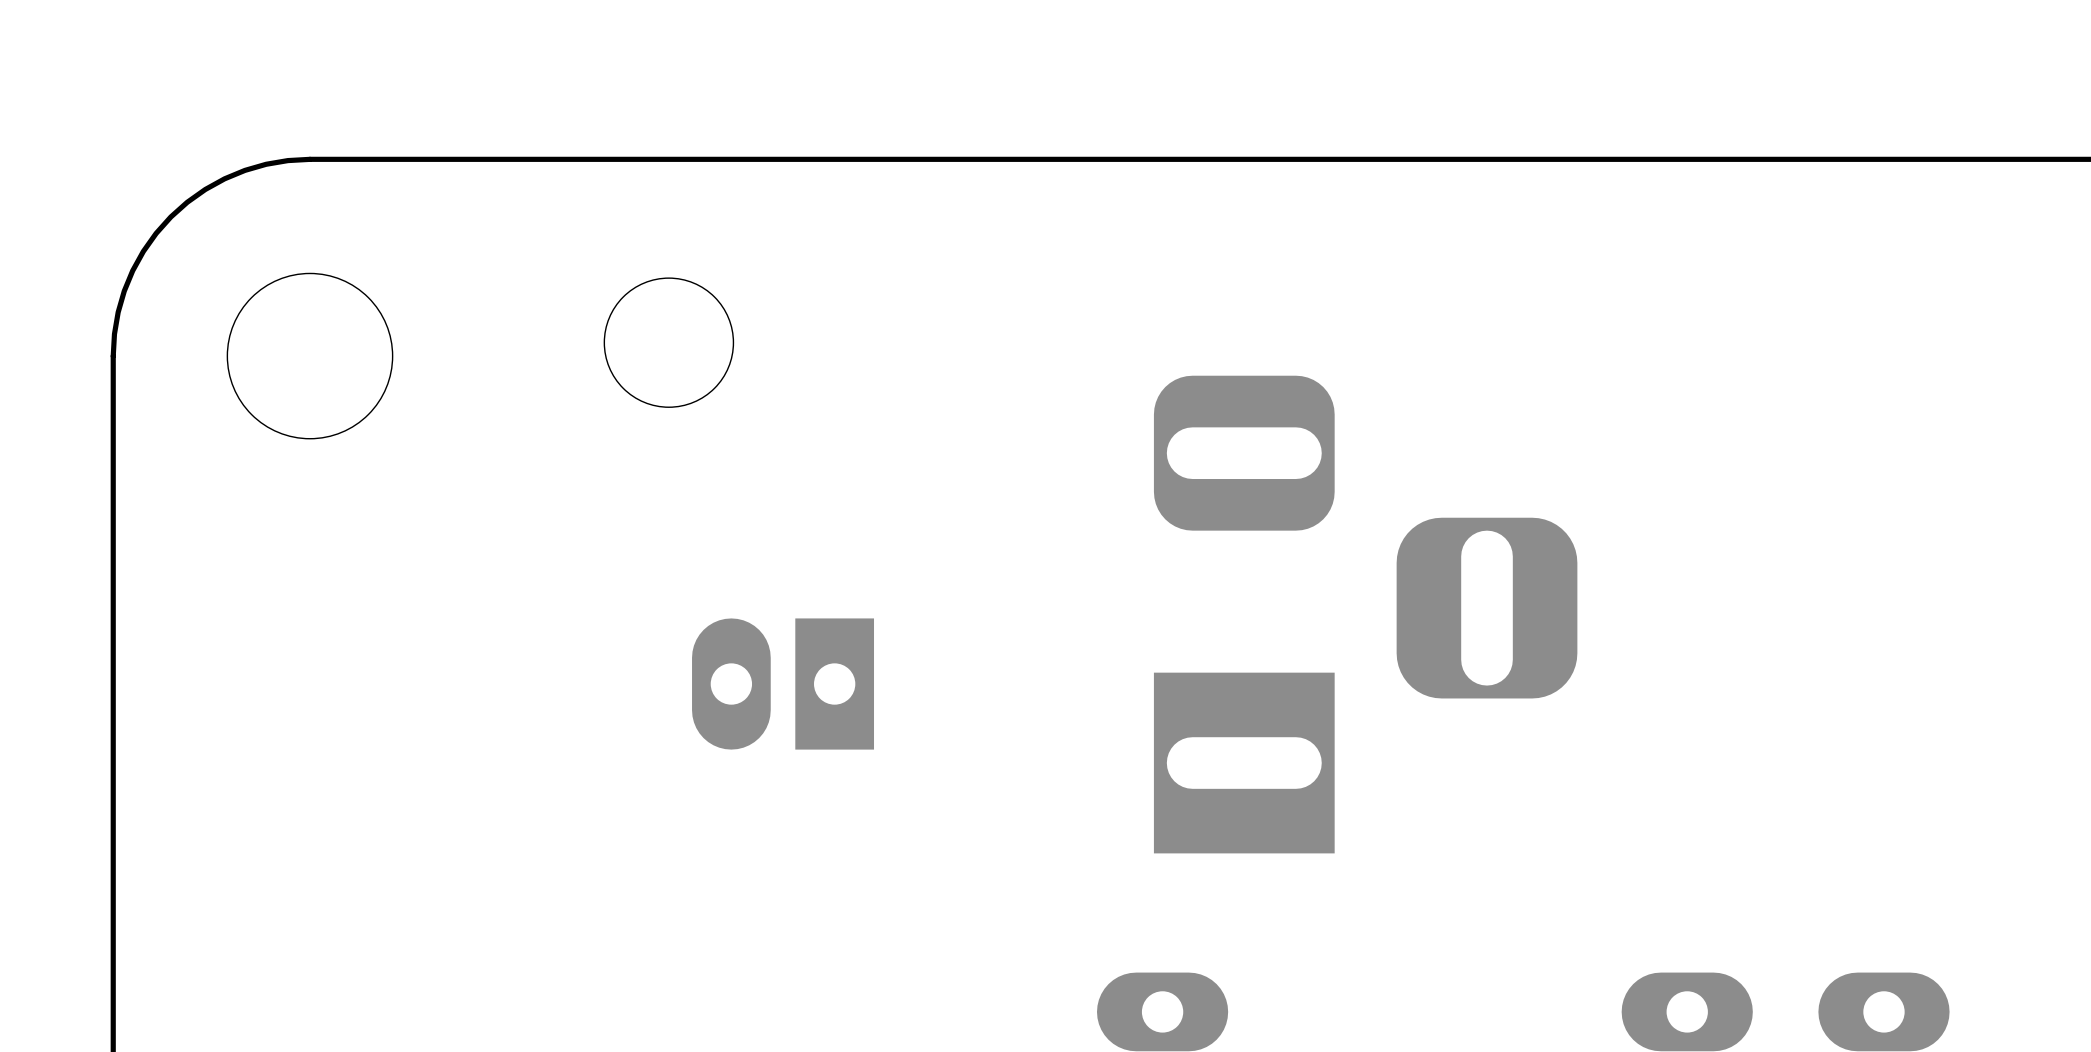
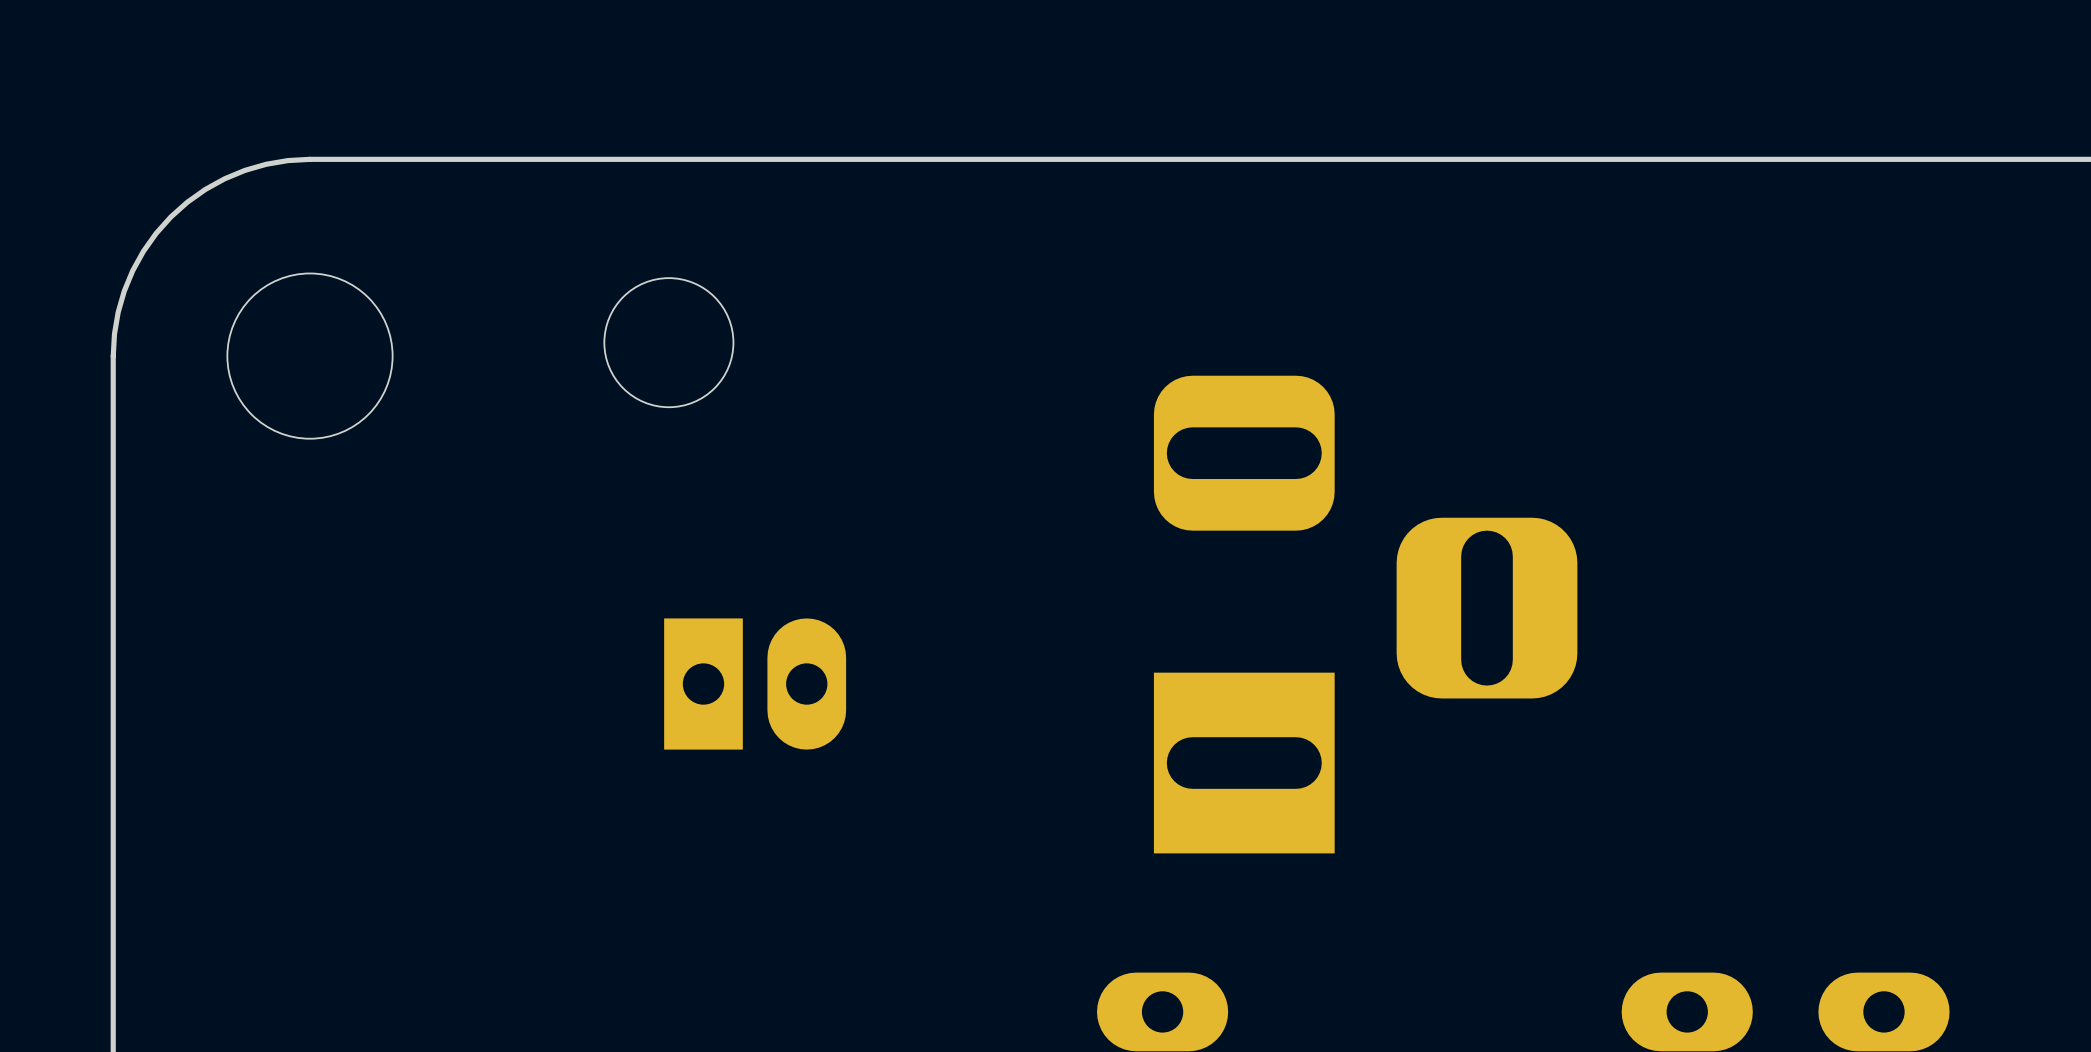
part rotation: 0° (783, 684) -> 180° (755, 684)

